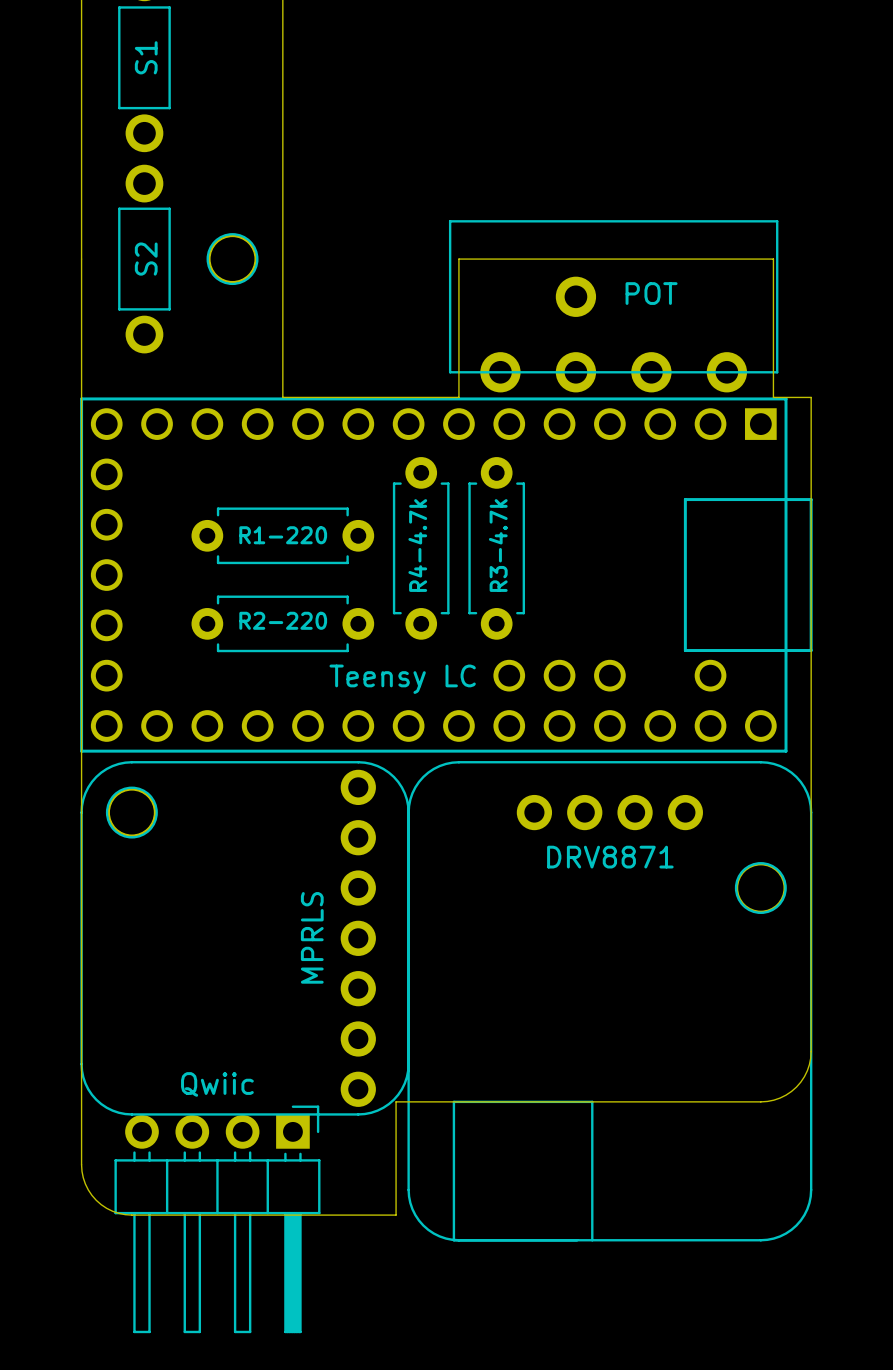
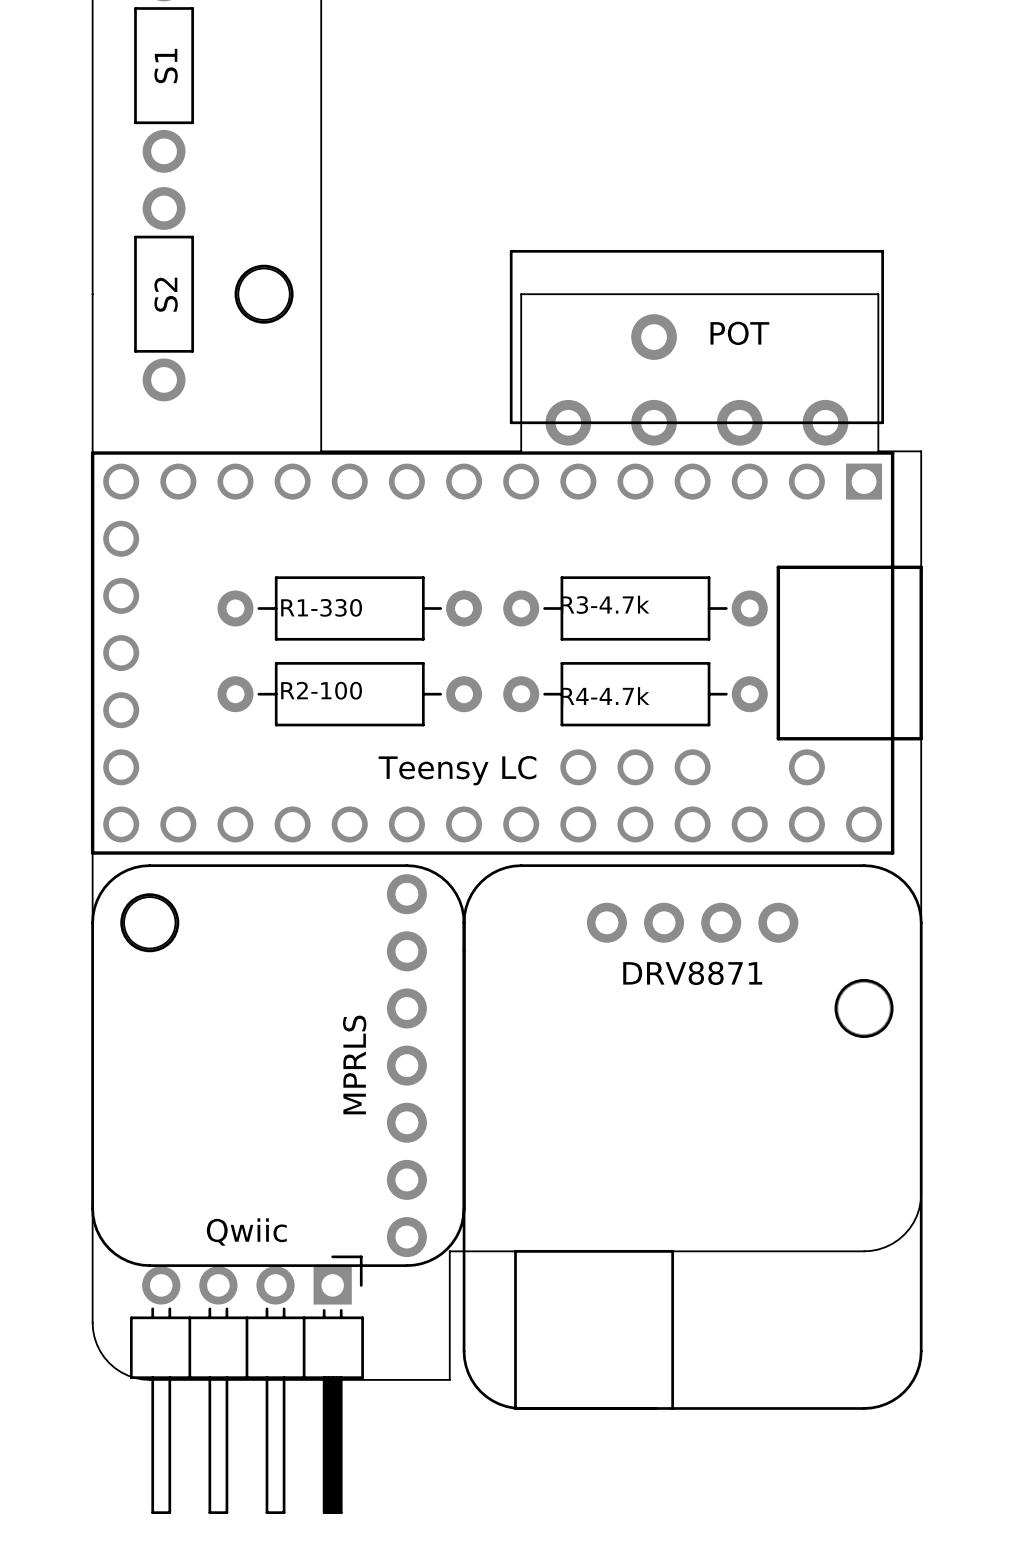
R4-4.7k footprint: [392, 457, 450, 640] -> [503, 662, 768, 727]
R3-4.7k footprint: [468, 457, 526, 640] -> [503, 576, 768, 641]
R1-220: (282, 535) -> none
R1-330: none -> (349, 608)
R2-100: none -> (349, 694)
R2-220: (282, 623) -> none

